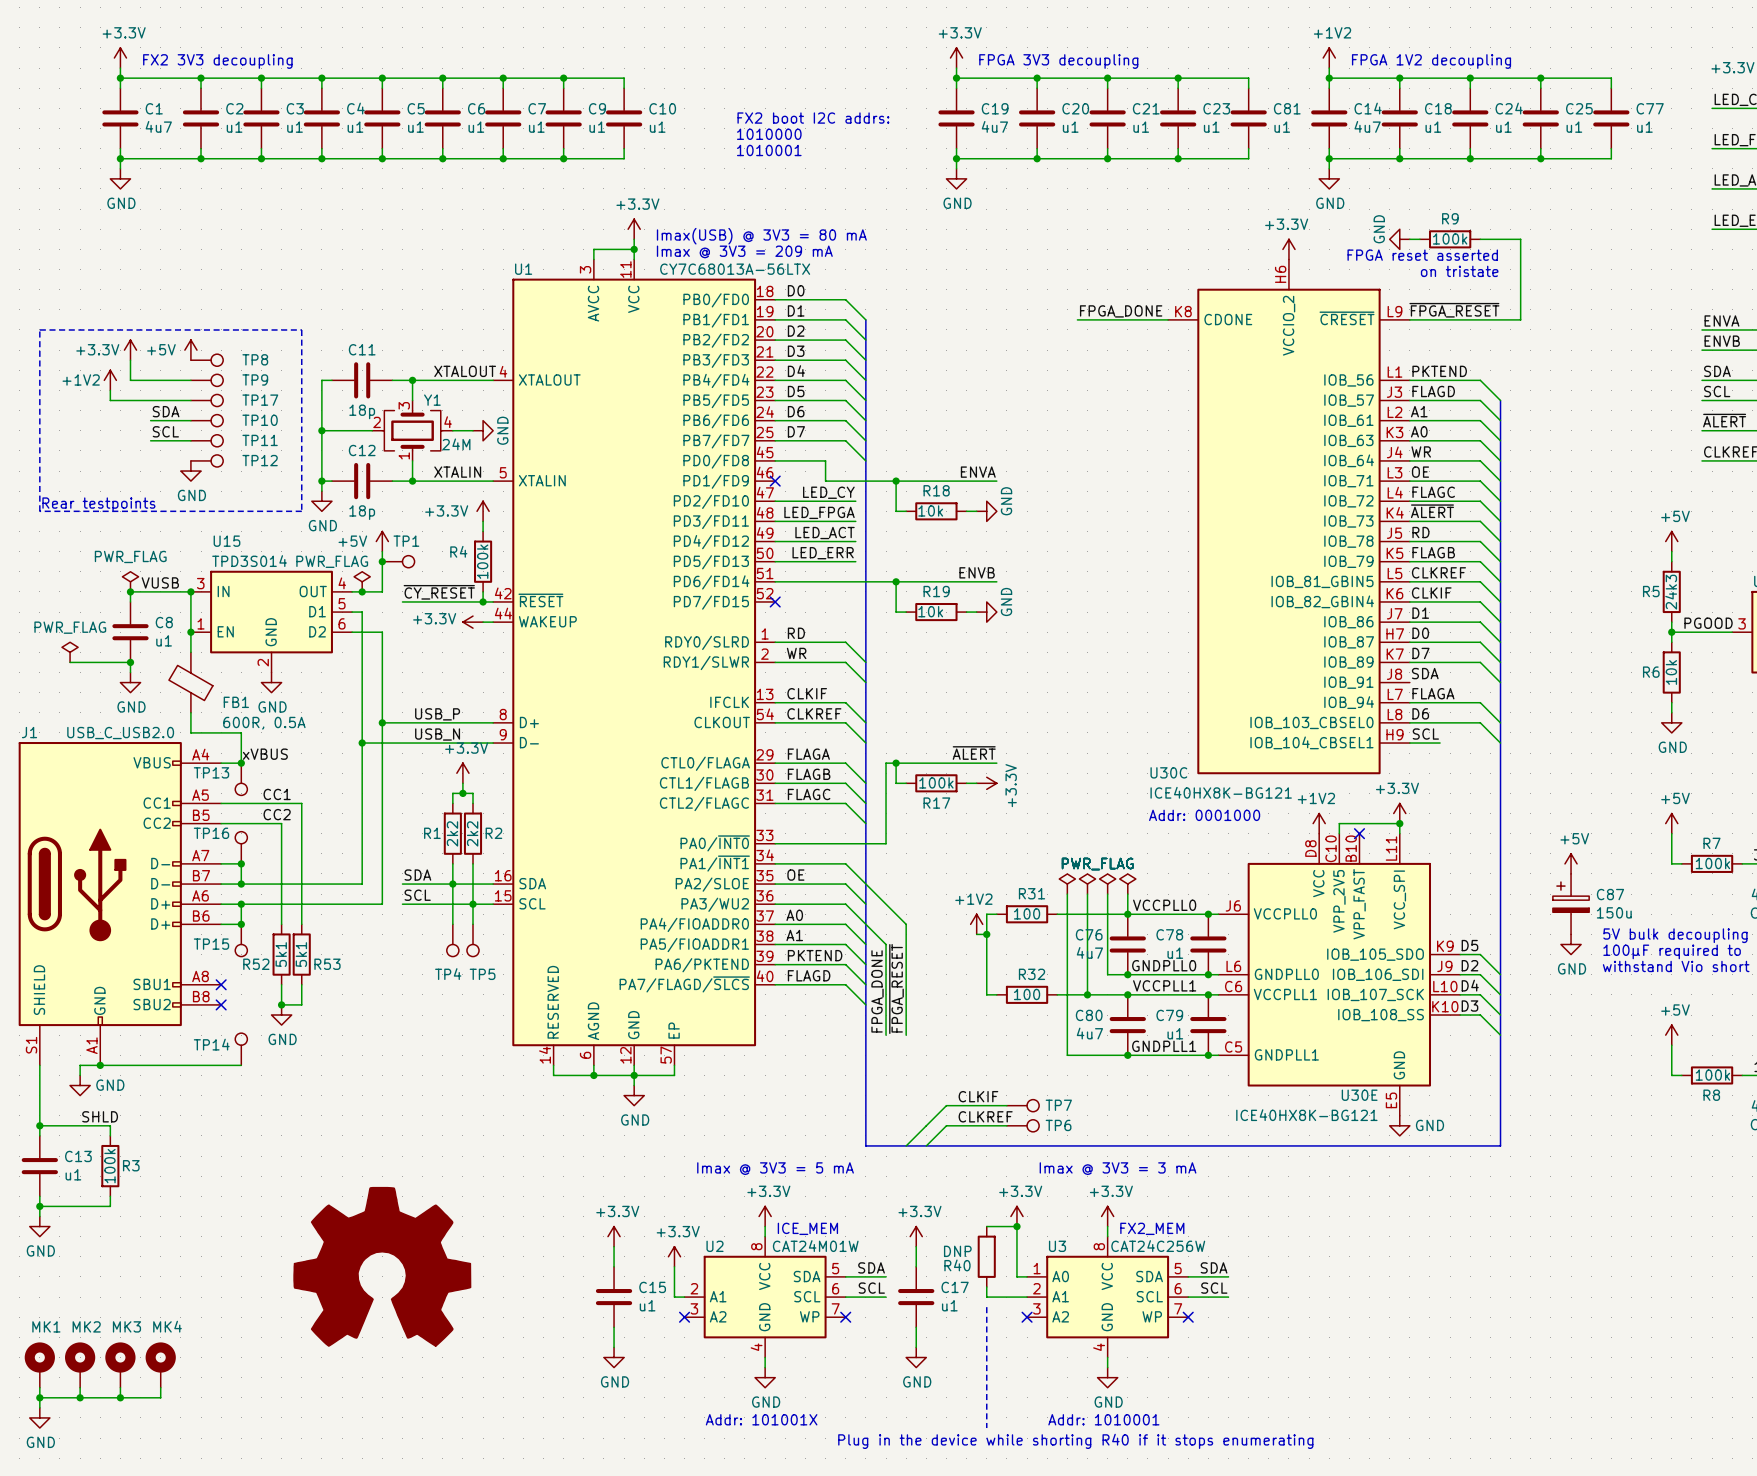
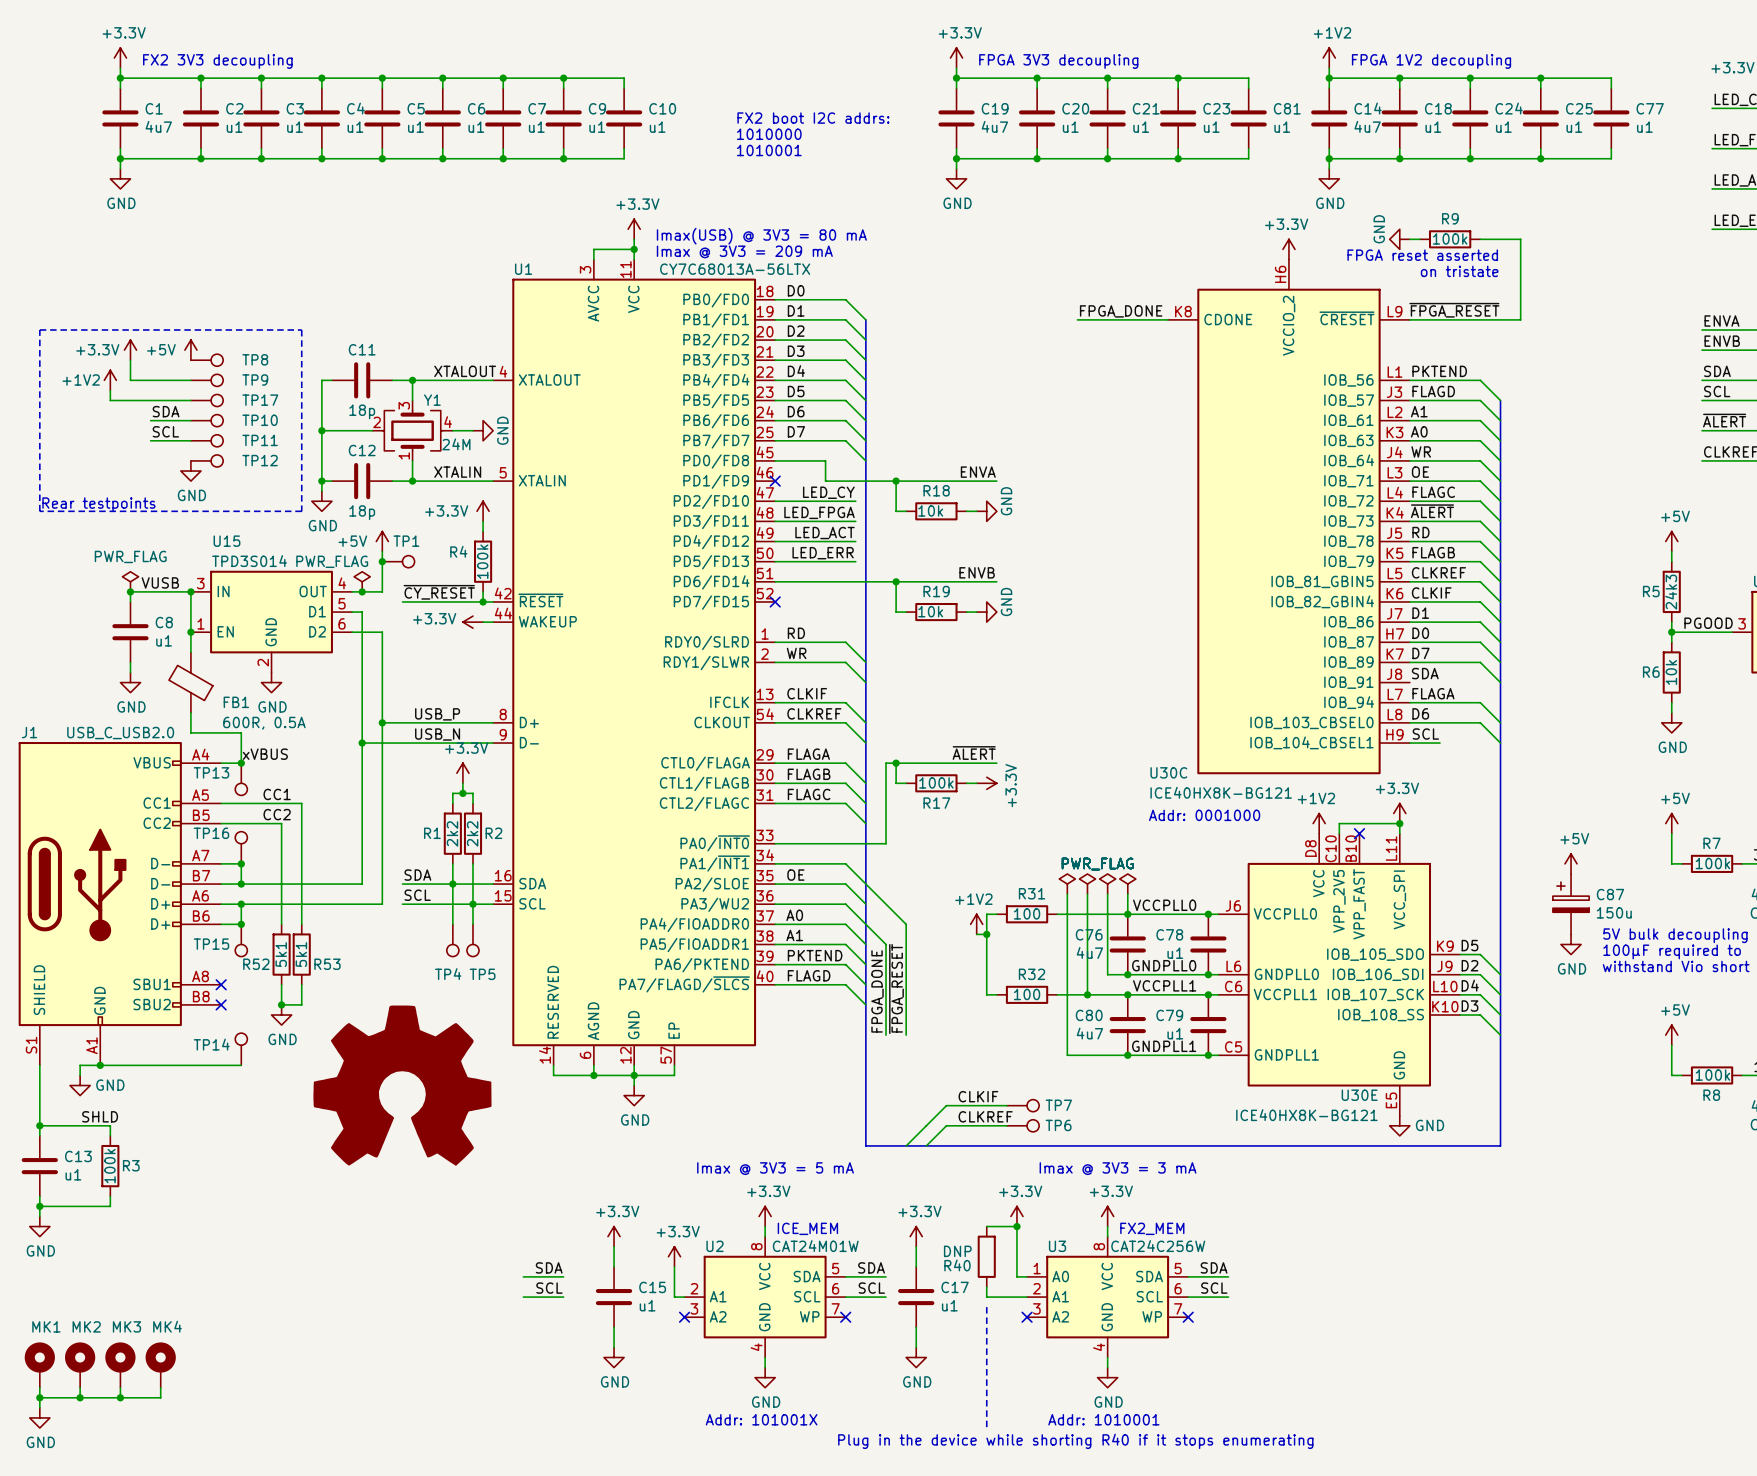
power symbol: PWR_FLAG (70, 652) -> none
wire: (70, 662) (130, 662) -> none
junction: (130, 662) -> none
power symbol position: (382, 1266) -> (402, 1085)
label: none -> SDA (549, 1267)
wire: none -> (523, 1276) (563, 1276)
label: none -> SCL (549, 1288)
wire: none -> (523, 1297) (563, 1297)

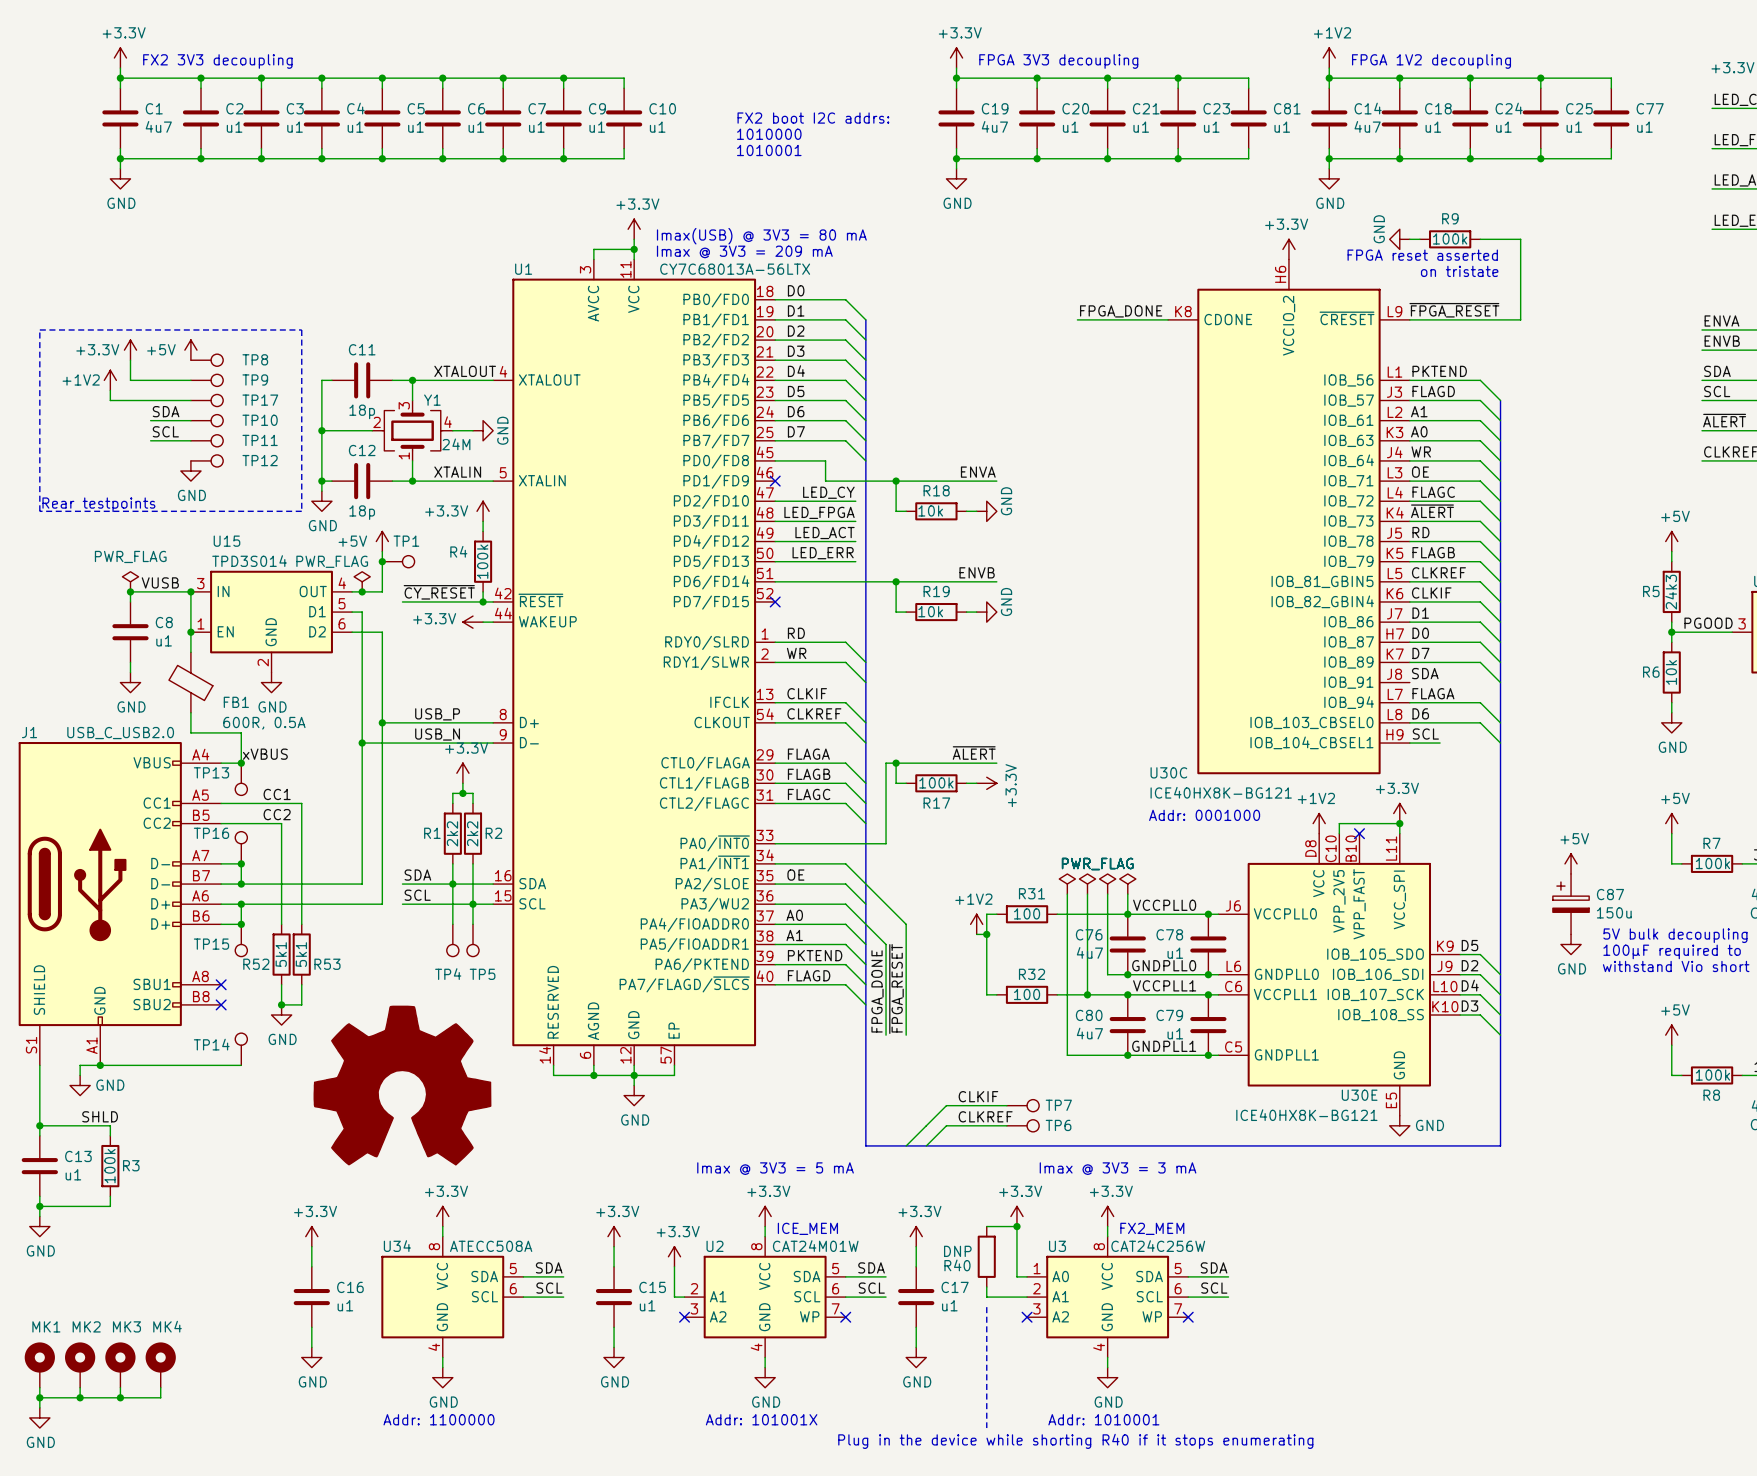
power symbol: none -> +3.3V (442, 1216)
wire: none -> (442, 1226) (442, 1236)
power symbol: none -> +3.3V (311, 1236)
wire: none -> (311, 1246) (311, 1266)
C16: none -> u1 (311, 1297)
U34: none -> ATECC508A (452, 1297)
wire: none -> (311, 1327) (311, 1347)
power symbol: none -> GND (311, 1357)
wire: none -> (442, 1357) (442, 1367)
power symbol: none -> GND (442, 1377)
text: none -> Addr: 1100000 (439, 1419)

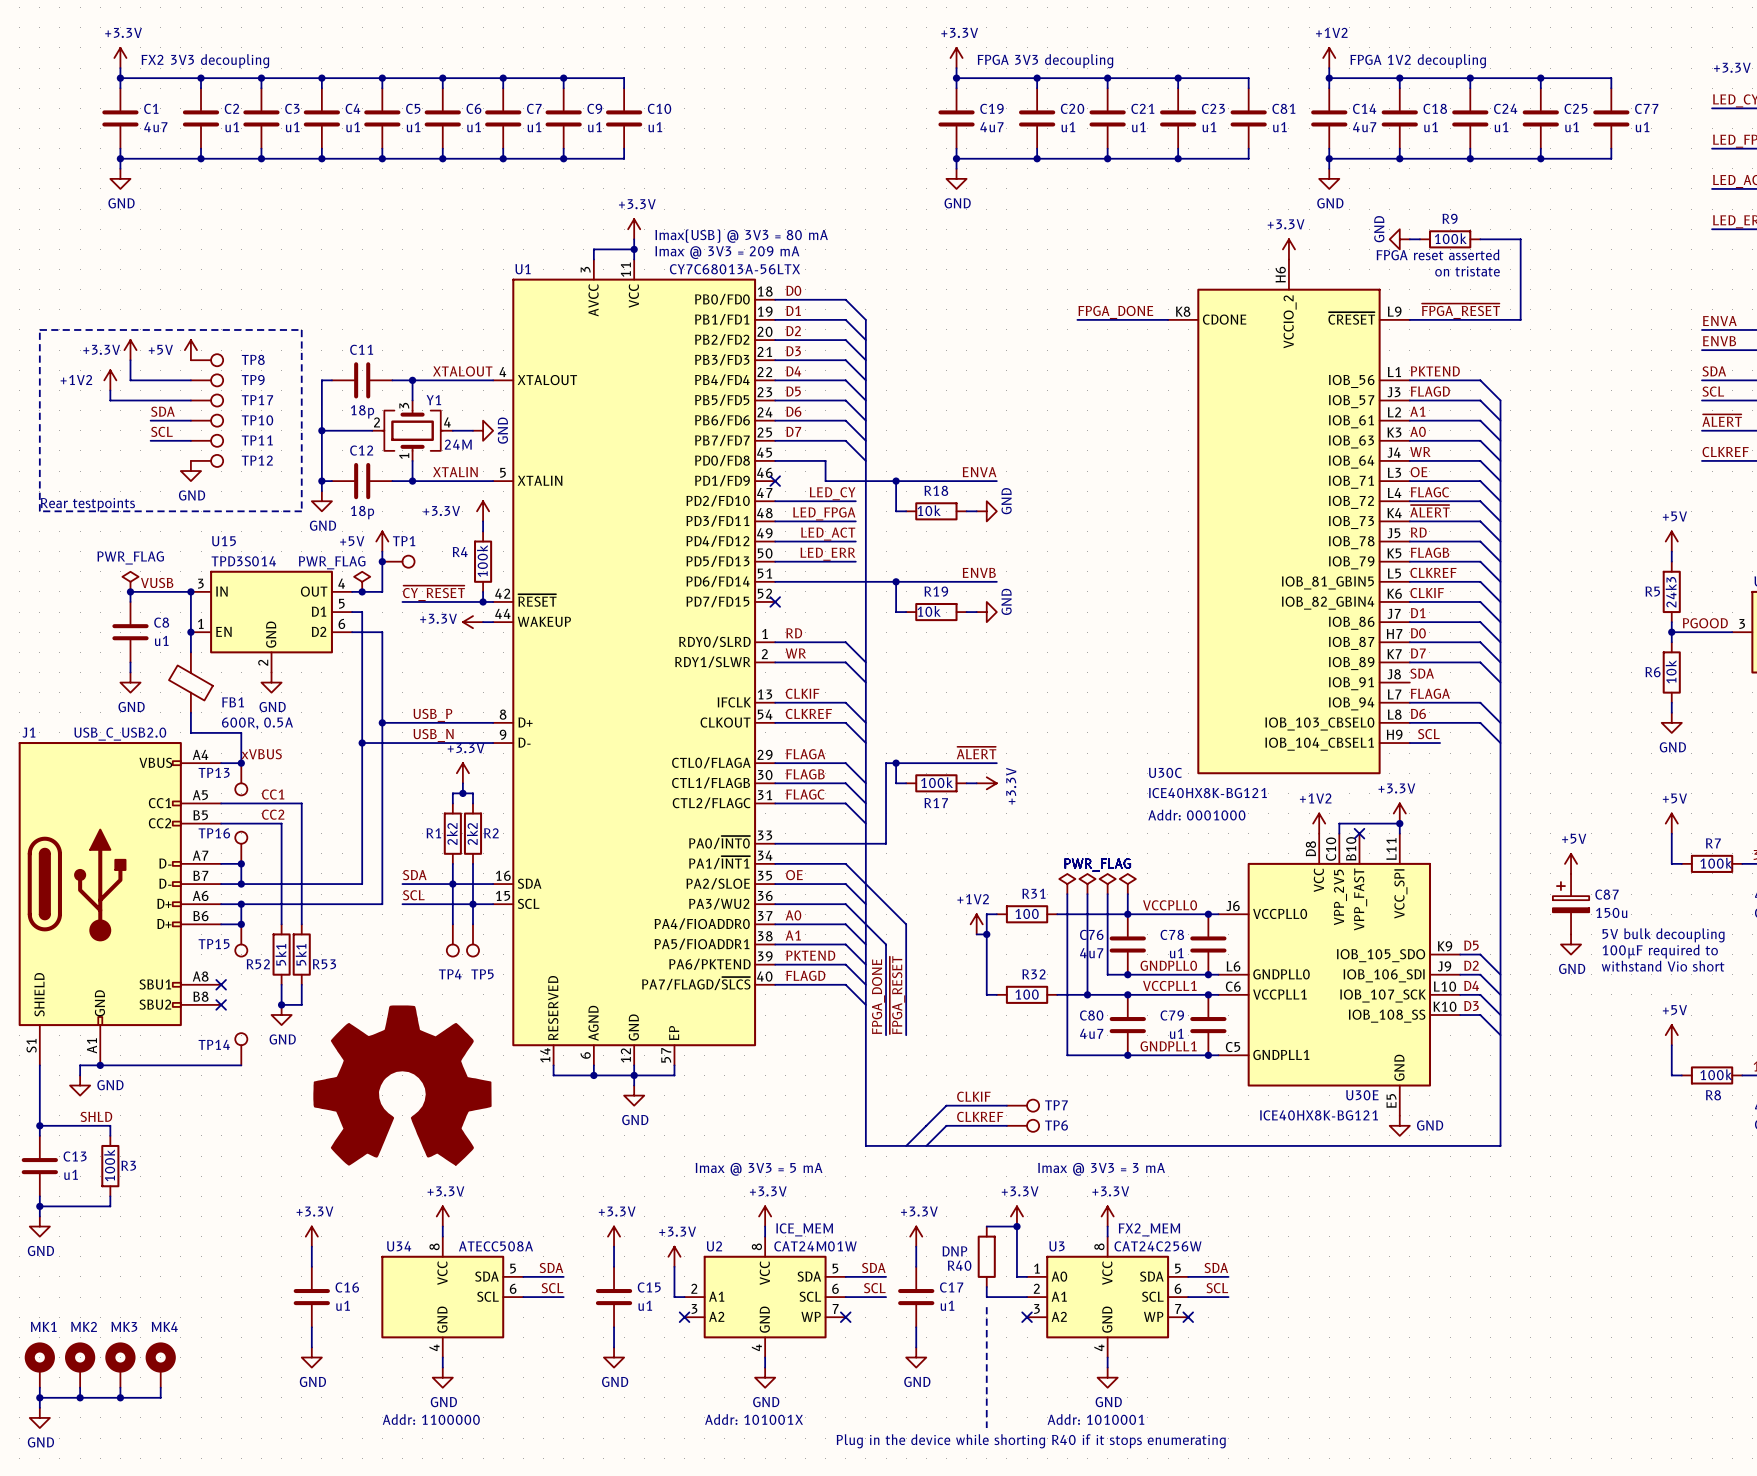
text: FX2 boot I2C addrs: (813, 118) -> none
text: 1010000 (769, 134) -> none
text: 1010001 (769, 150) -> none

